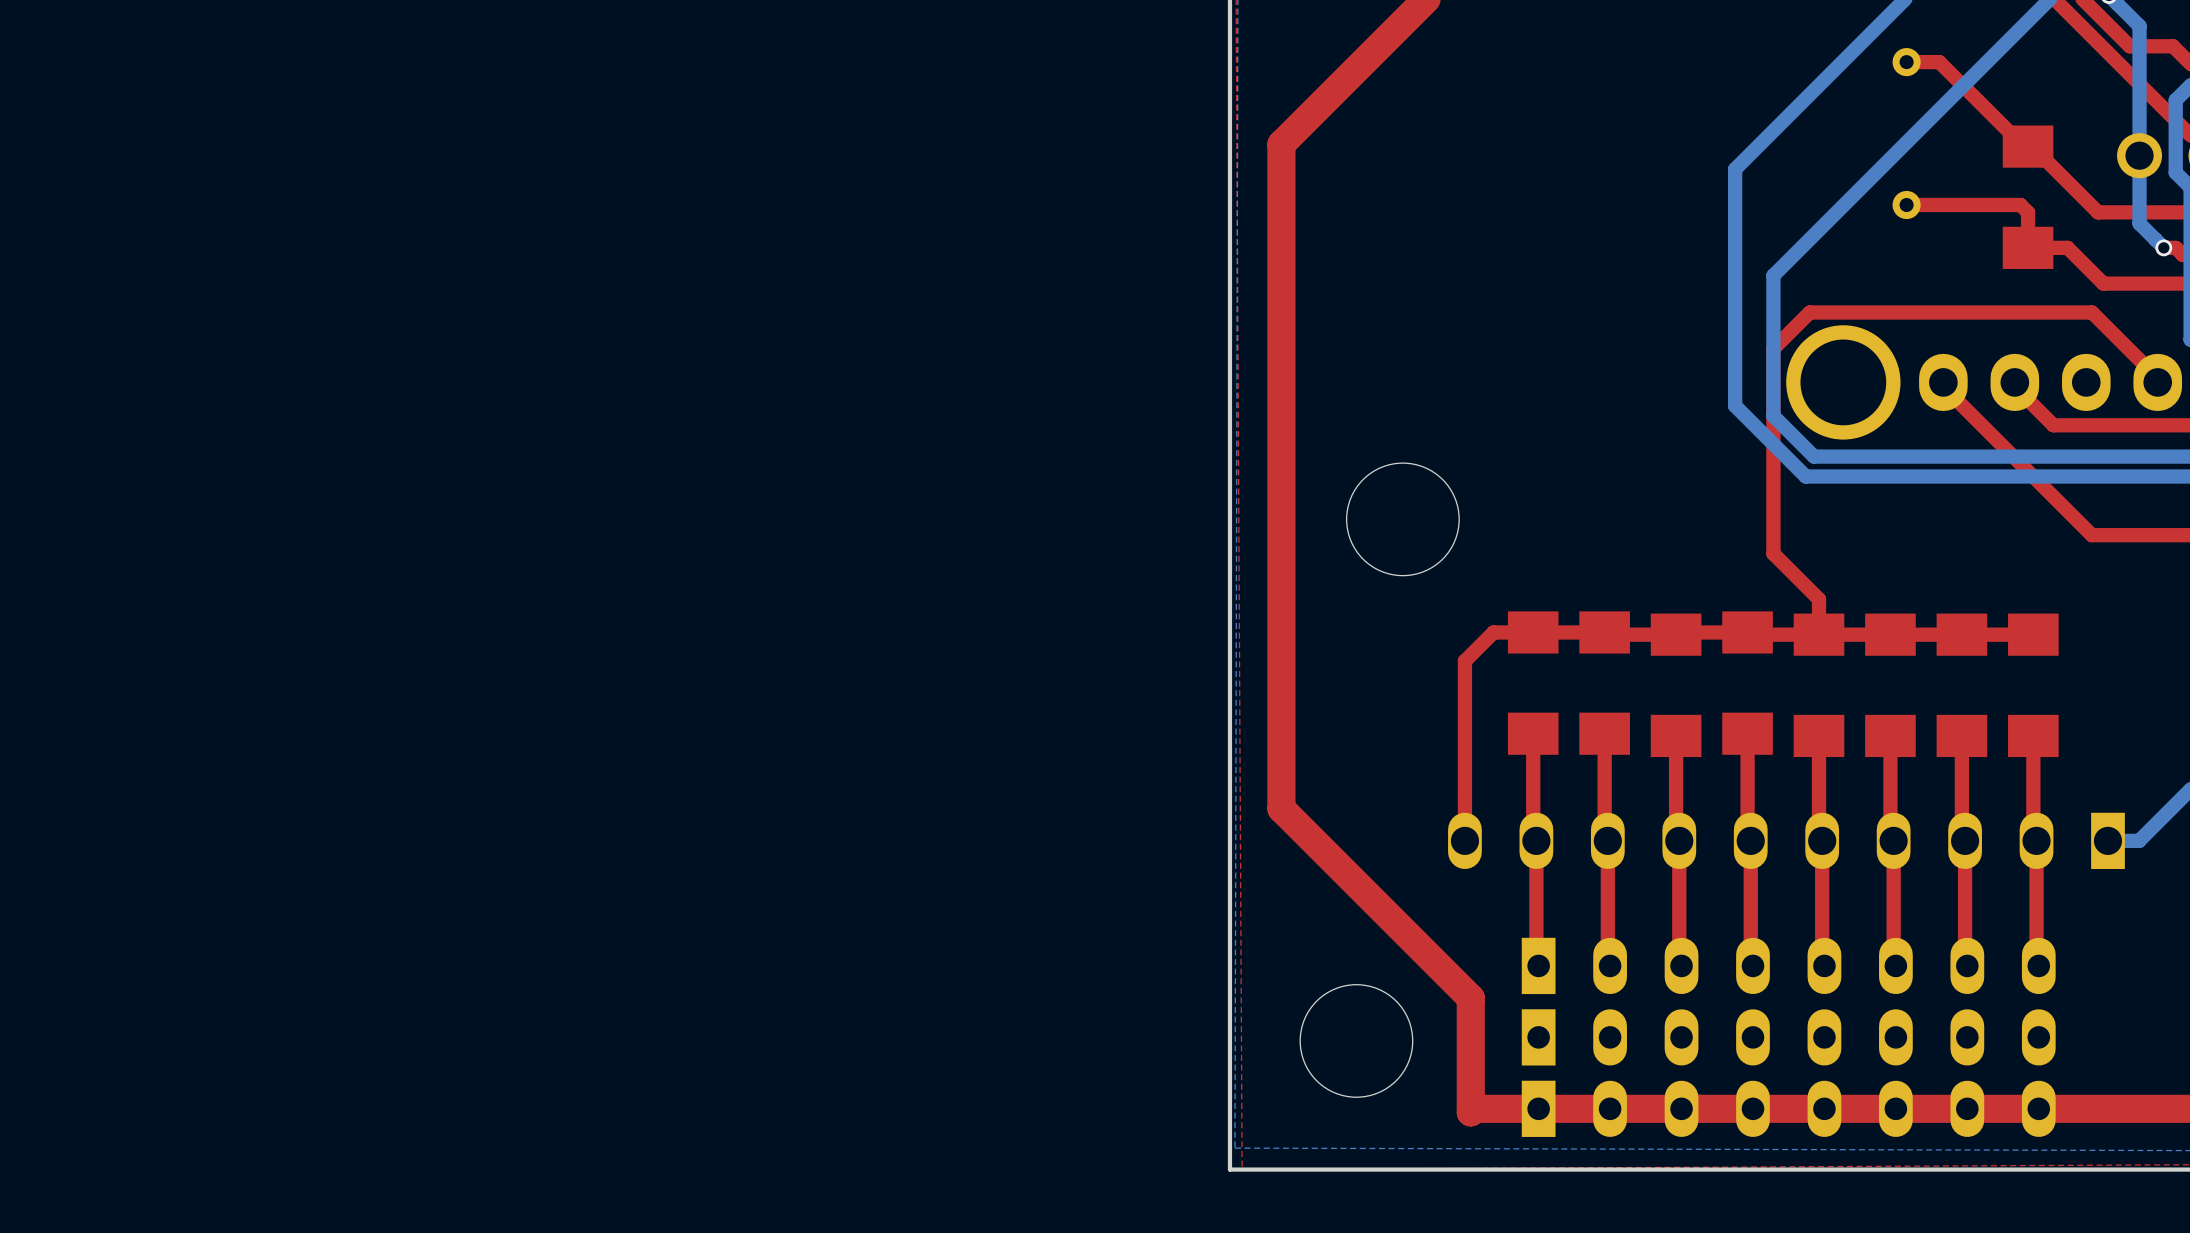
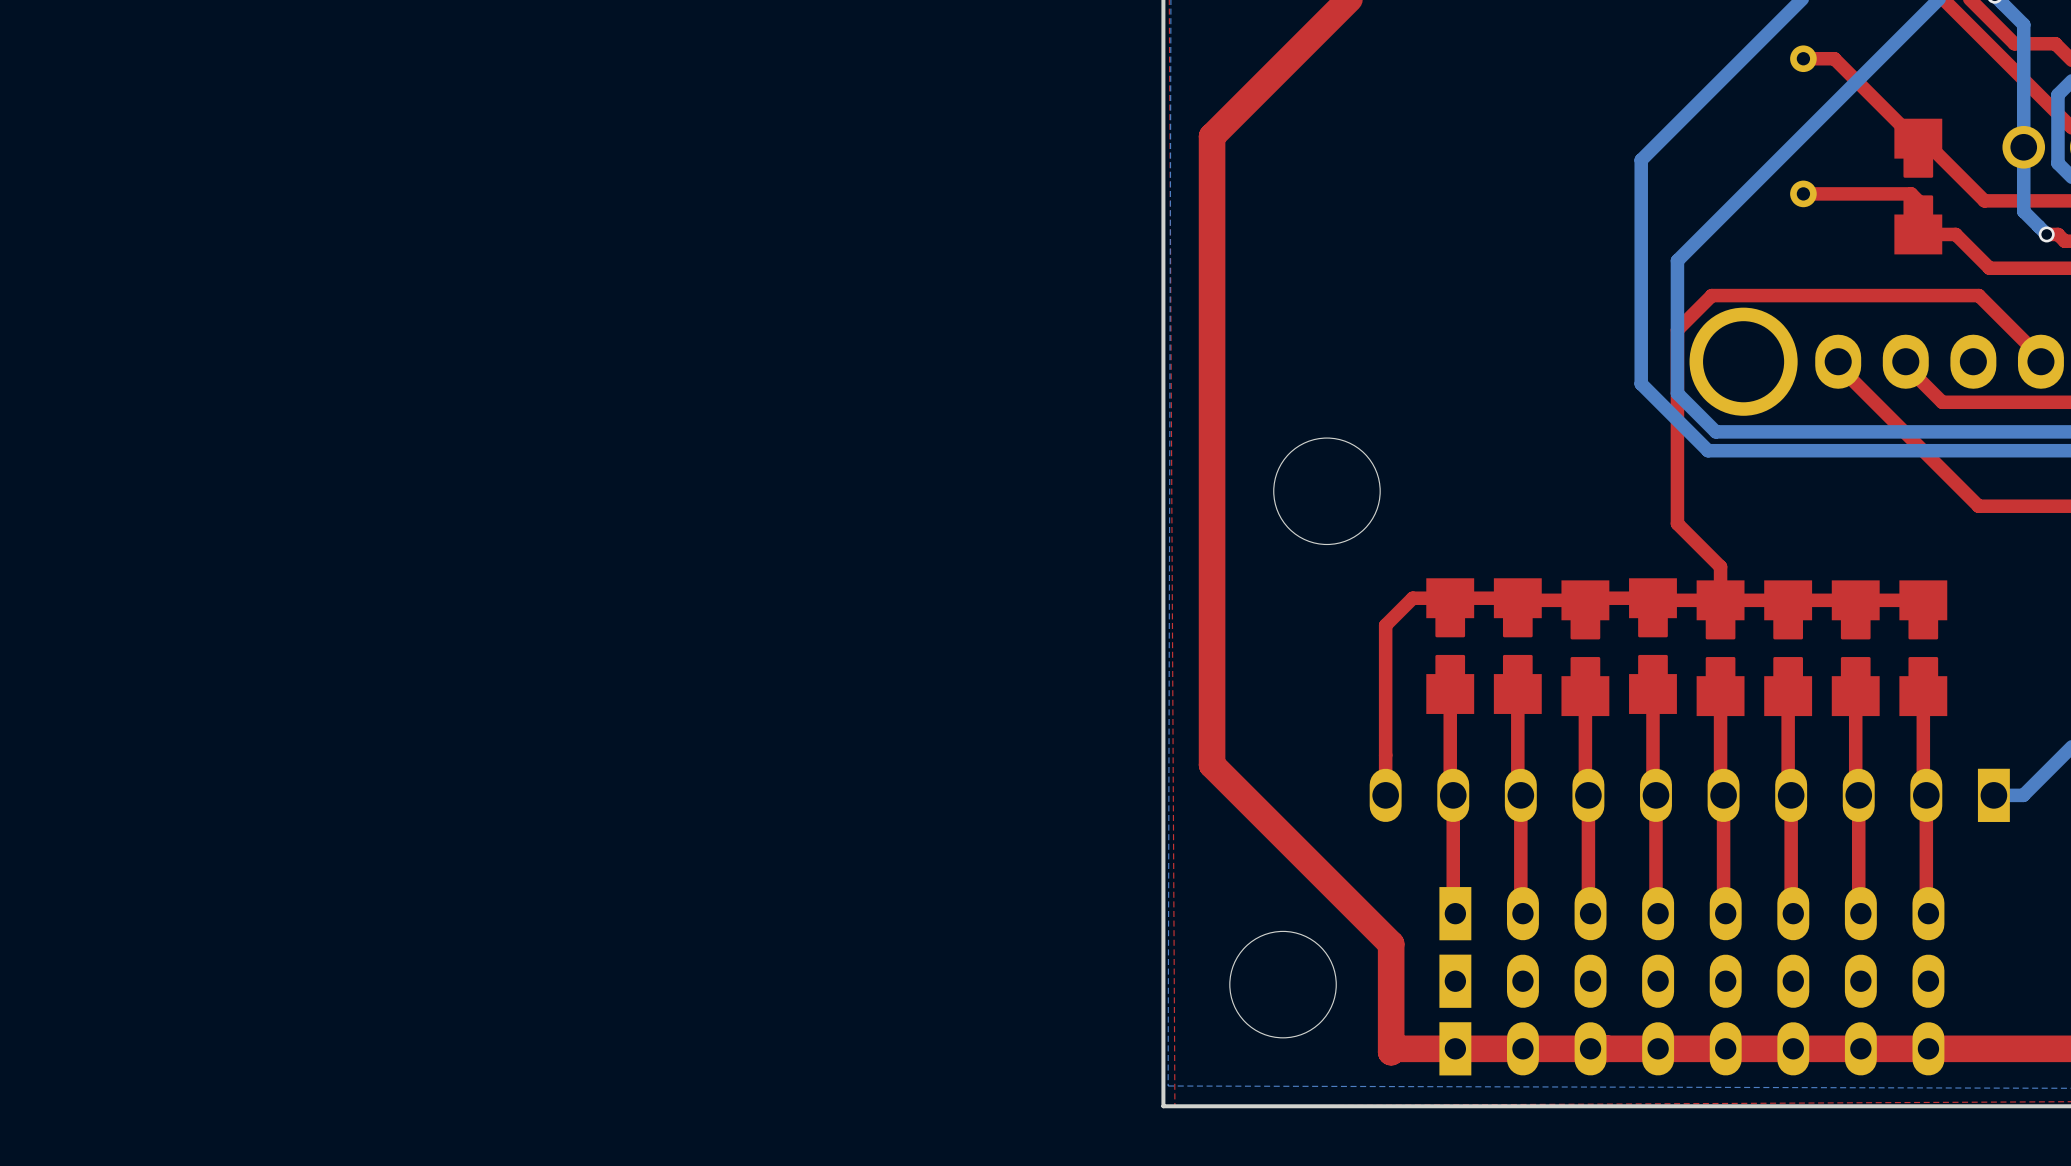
part footprint: [2002, 125, 2054, 269] -> [1894, 118, 1943, 255]
part footprint: [1507, 611, 1559, 755] -> [1426, 578, 1475, 714]
part footprint: [1579, 611, 1630, 755] -> [1493, 578, 1542, 714]
part footprint: [1722, 611, 1773, 755] -> [1629, 578, 1677, 714]
part footprint: [1650, 613, 1702, 758] -> [1561, 580, 1610, 717]
part footprint: [1793, 613, 1845, 758] -> [1696, 580, 1745, 717]
part footprint: [1865, 613, 1916, 758] -> [1764, 580, 1813, 717]
part footprint: [1936, 613, 1988, 758] -> [1831, 580, 1880, 717]
part footprint: [2008, 613, 2059, 758] -> [1899, 580, 1948, 717]

